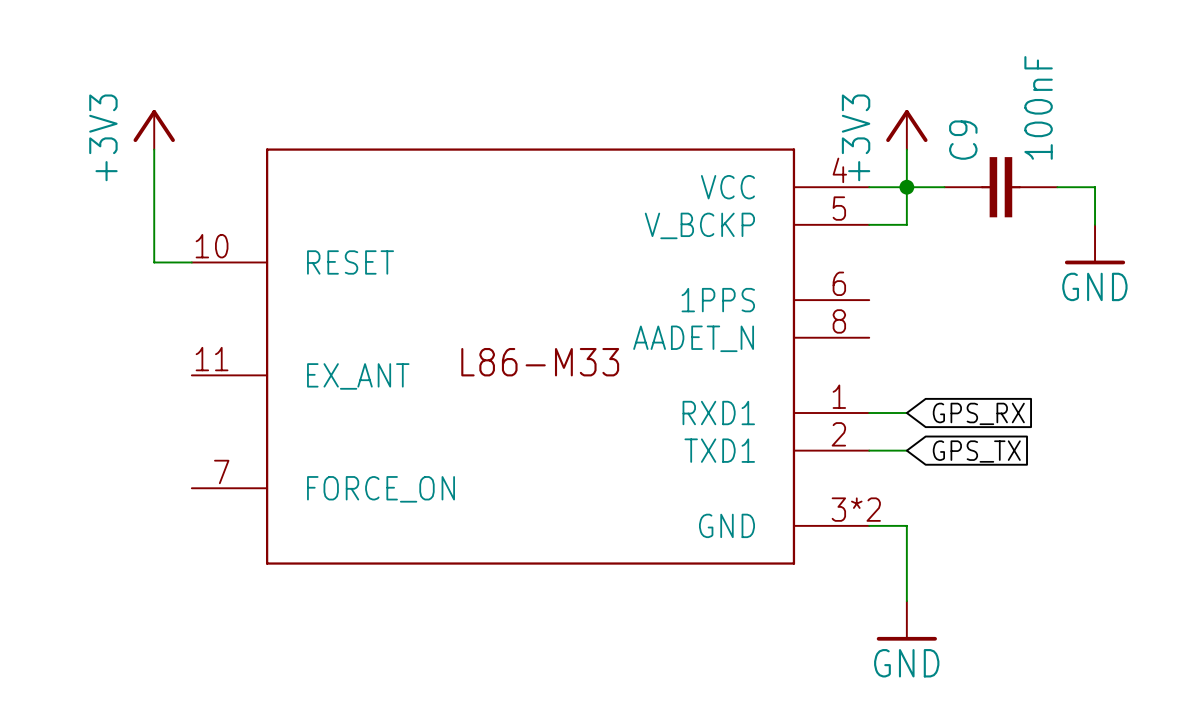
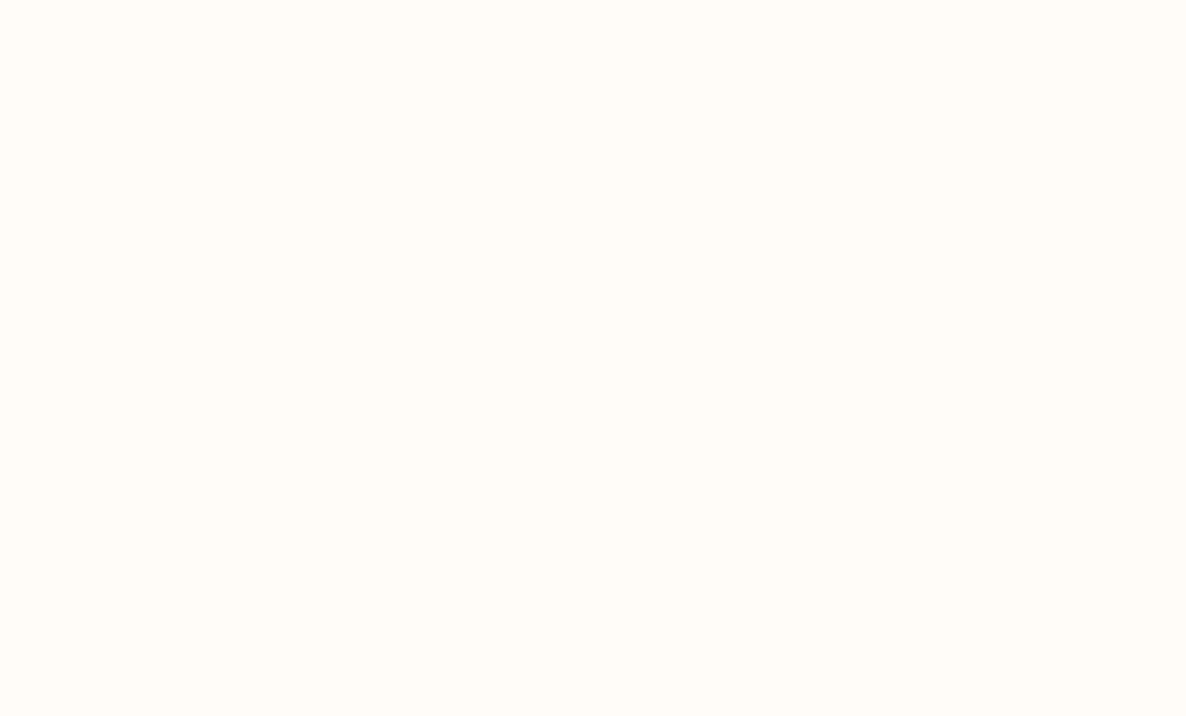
power symbol: +3V3 (154, 129) -> none
power symbol: +3V3 (906, 129) -> none
wire: (154, 149) (154, 262) (191, 262) -> none
wire: (906, 149) (906, 224) (869, 224) -> none
wire: (869, 187) (944, 187) -> none
junction: (906, 187) -> none
C9: 100nF (1000, 187) -> none
wire: (1057, 187) (1095, 187) (1095, 224) -> none
power symbol: GND (1095, 244) -> none
part: (530, 356) -> none
wire: (869, 413) (906, 413) -> none
global label: GPS_RX (978, 413) -> none
wire: (869, 450) (906, 450) -> none
global label: GPS_TX (976, 451) -> none
wire: (869, 525) (906, 525) (906, 601) -> none
power symbol: GND (906, 620) -> none

